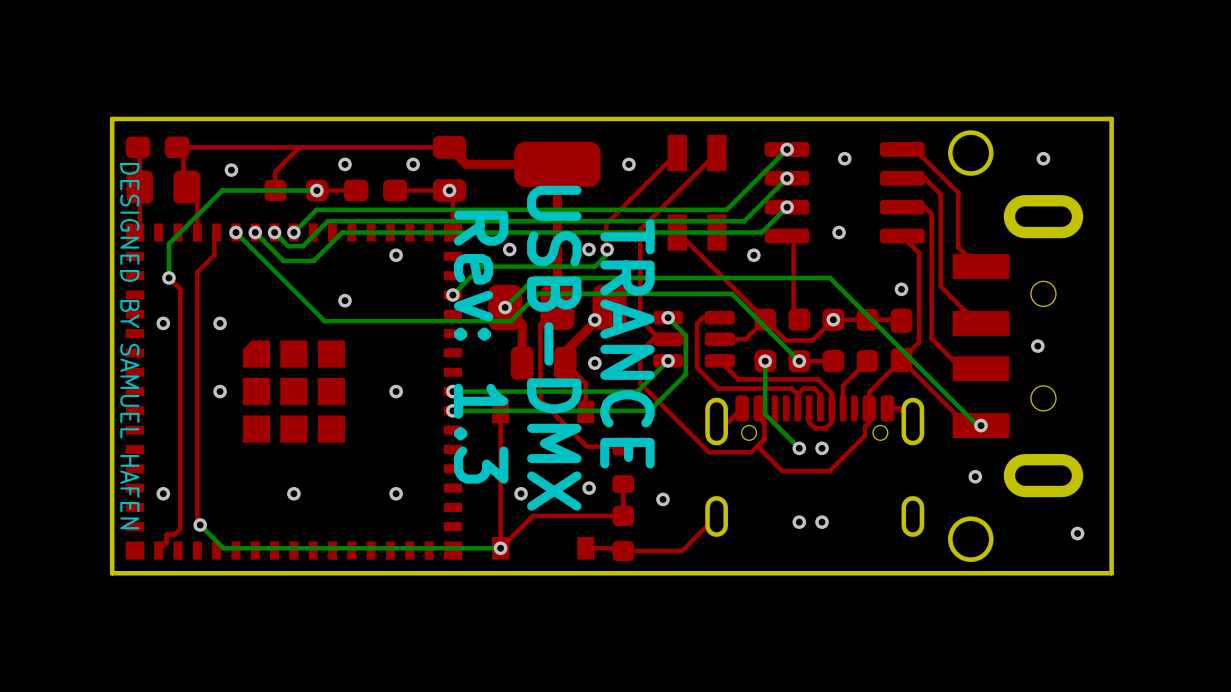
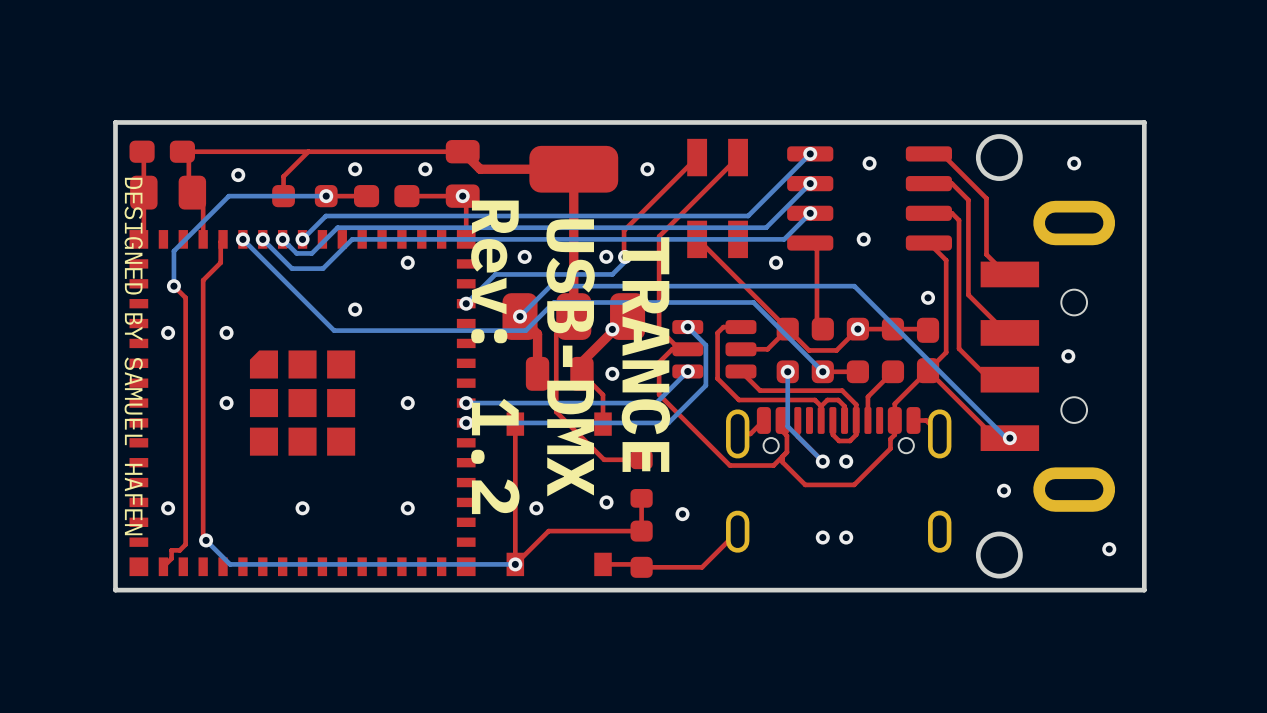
text: Rev: 1.3 (481, 347) -> Rev: 1.2 (495, 357)

